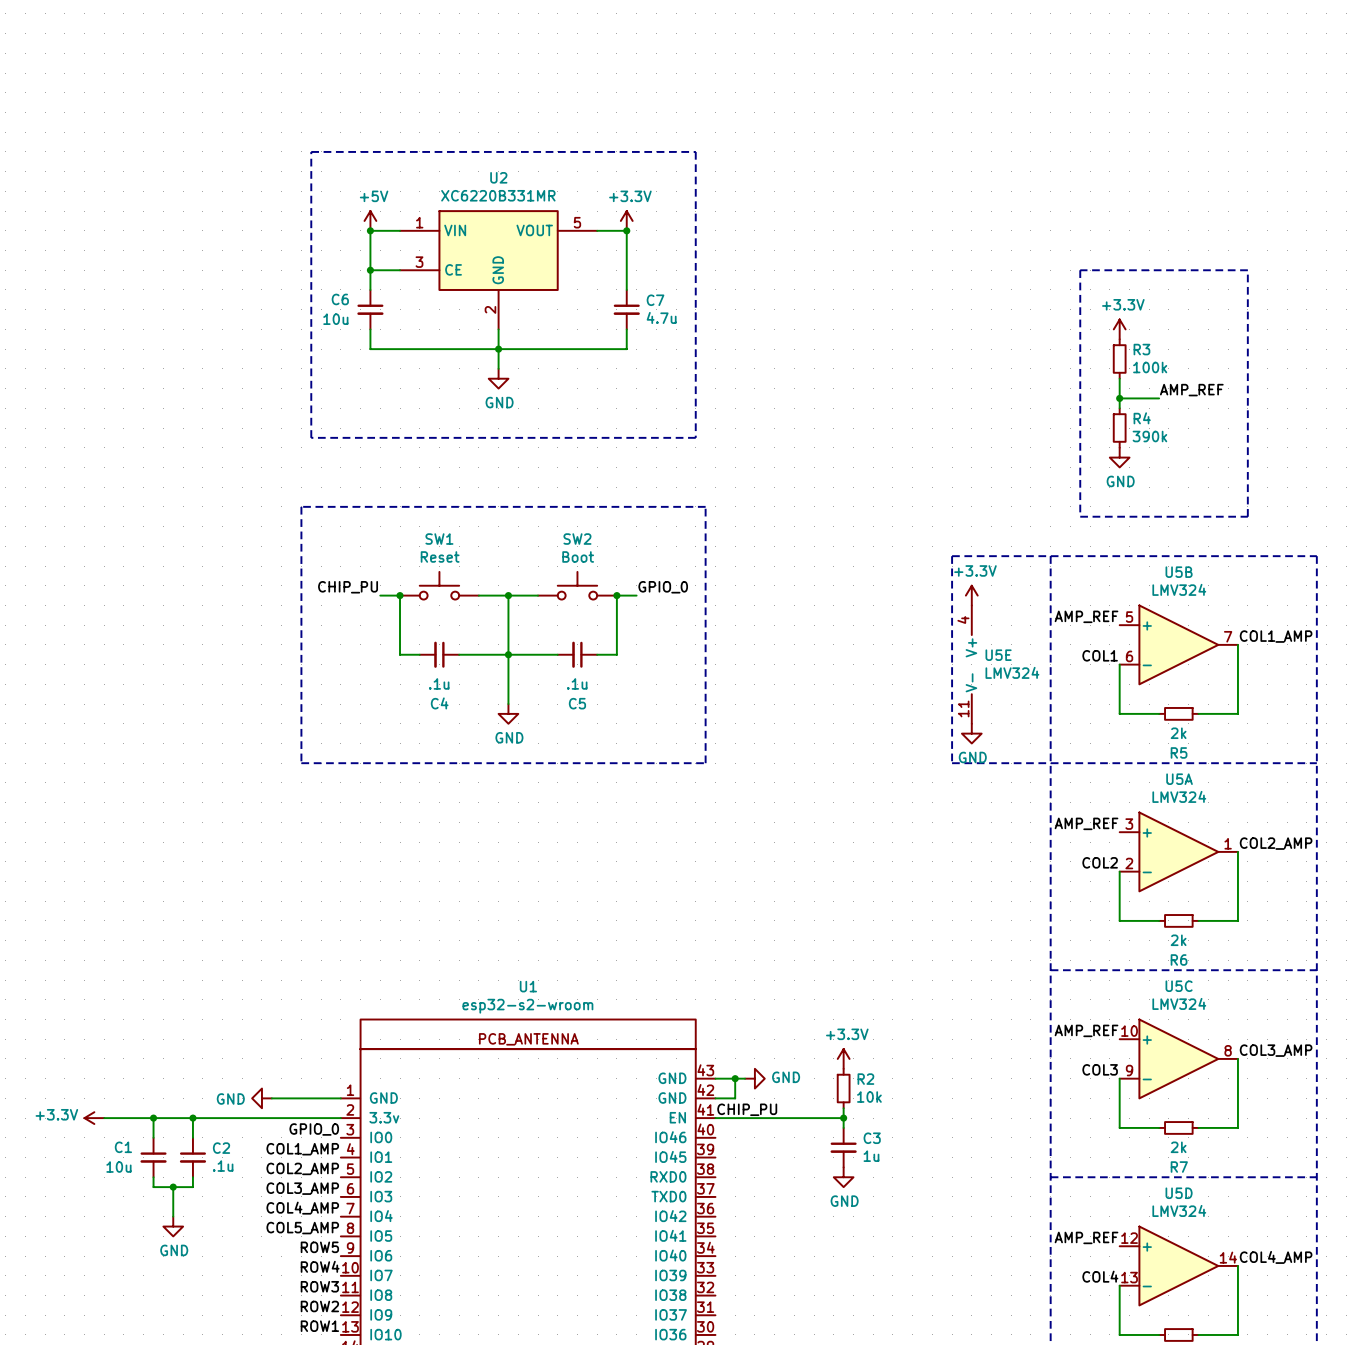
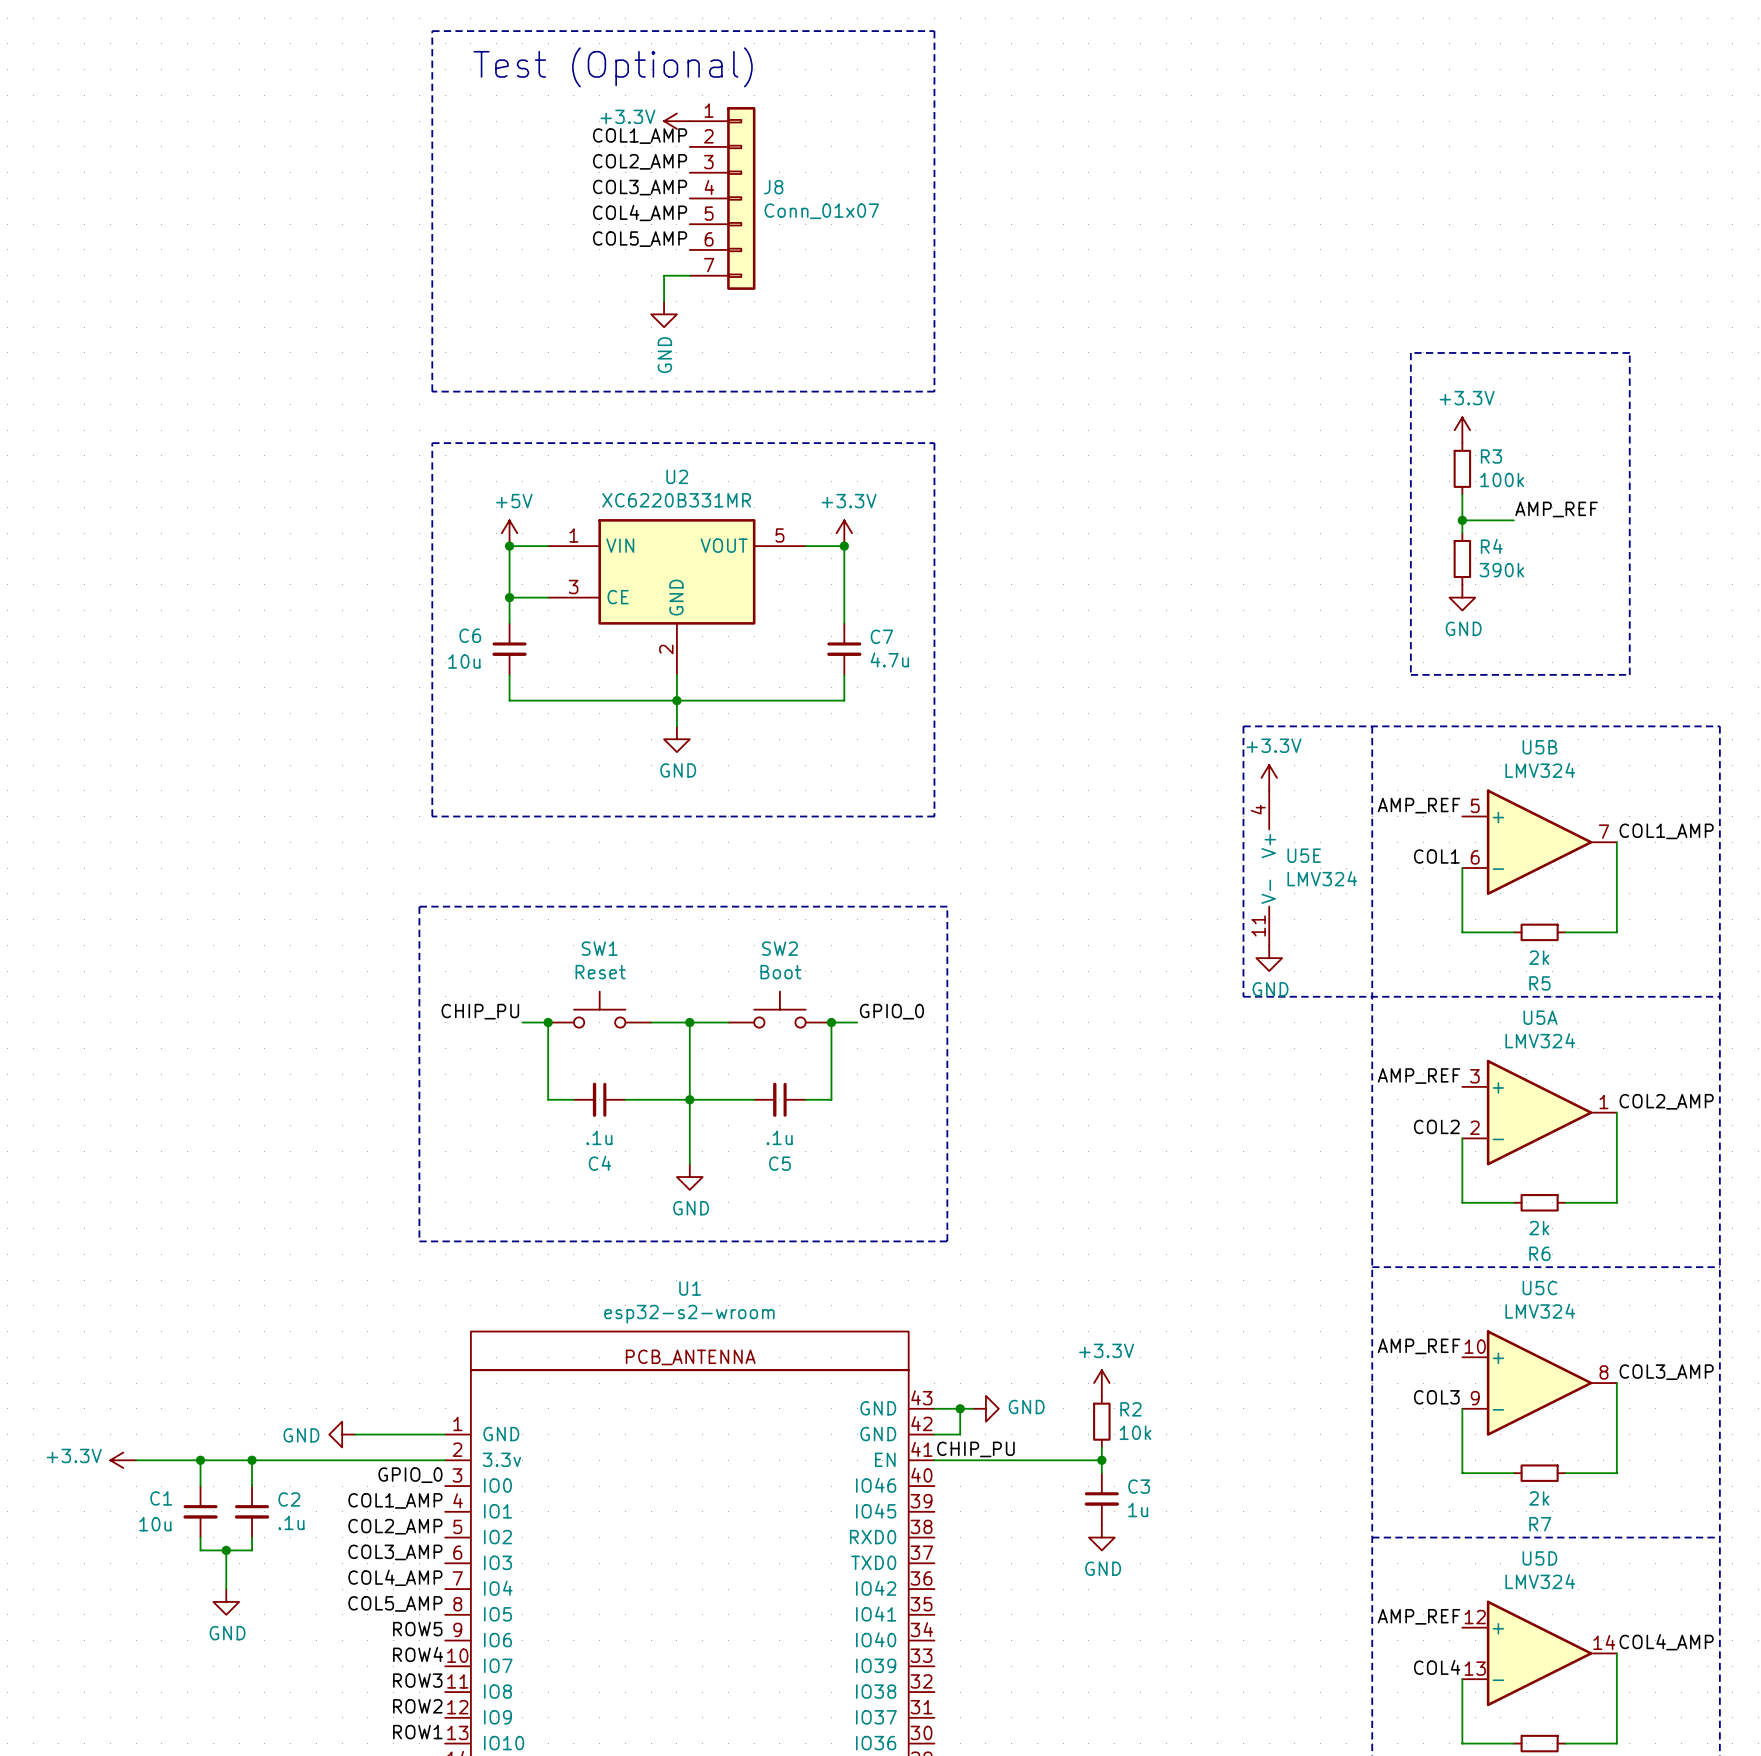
line: none -> (432, 31) (432, 391) (934, 391) (934, 31) (432, 31)
text: none -> Test (Optional) (613, 67)
power symbol: none -> +3.3V (676, 121)
label: none -> COL1_AMP (640, 136)
label: none -> COL2_AMP (640, 161)
label: none -> COL3_AMP (640, 187)
line: (311, 151) (311, 437) (695, 437) (695, 151) (311, 151) -> (432, 443) (432, 816) (934, 816) (934, 443) (432, 443)
J8: none -> Conn_01x07 (722, 198)
label: none -> COL4_AMP (640, 213)
label: none -> COL5_AMP (640, 239)
power symbol position: +5V (370, 220) -> +5V (509, 533)
power symbol: +3.3V (626, 220) -> none
junction: (370, 230) -> none
wire: (400, 230) (370, 230) (370, 289) -> (548, 546) (509, 546) (509, 623)
wire: (597, 230) (626, 230) (626, 289) -> (805, 546) (844, 546) (844, 623)
junction: (626, 230) -> none
power symbol: none -> GND (664, 314)
U2 position: (498, 269) -> (676, 596)
wire: (370, 270) (400, 270) -> (509, 597) (548, 597)
junction: (370, 270) -> none
C6 position: (370, 309) -> (509, 649)
C7 position: (626, 309) -> (844, 649)
wire: (370, 329) (370, 349) (626, 349) (626, 329) -> (509, 674) (509, 700) (844, 700) (844, 674)
wire: (498, 329) (498, 368) -> (676, 674) (676, 726)
junction: (498, 349) -> none
power symbol: GND (498, 378) -> none
power symbol: none -> +3.3V (844, 533)
junction: none -> (509, 546)
junction: none -> (844, 546)
junction: none -> (509, 597)
line: (301, 506) (705, 506) (705, 763) (301, 763) (301, 506) -> (419, 906) (947, 906) (947, 1241) (419, 1241) (419, 906)
junction: none -> (676, 700)
power symbol: none -> GND (676, 739)
SW1 position: (439, 585) -> (599, 1009)
SW2 position: (577, 585) -> (779, 1009)
label position: CHIP_PU (348, 587) -> CHIP_PU (480, 1011)
label position: GPIO_0 (663, 587) -> GPIO_0 (891, 1011)
wire: (380, 595) (400, 595) (400, 654) (419, 654) -> (522, 1022) (548, 1022) (548, 1099) (573, 1099)
junction: (400, 595) -> none
wire: (478, 595) (538, 595) -> (651, 1022) (728, 1022)
wire: (508, 595) (508, 704) -> (689, 1022) (689, 1164)
junction: (508, 595) -> none
junction: (616, 595) -> none
wire: (636, 595) (616, 595) (616, 654) (597, 654) -> (857, 1022) (831, 1022) (831, 1099) (805, 1099)
C4 position: (439, 654) -> (599, 1099)
wire: (459, 654) (557, 654) -> (625, 1099) (754, 1099)
junction: (508, 654) -> none
C5 position: (577, 654) -> (779, 1099)
power symbol: GND (508, 713) -> none
junction: none -> (548, 1022)
junction: none -> (689, 1022)
junction: none -> (831, 1022)
junction: none -> (689, 1099)
power symbol: none -> GND (689, 1177)

